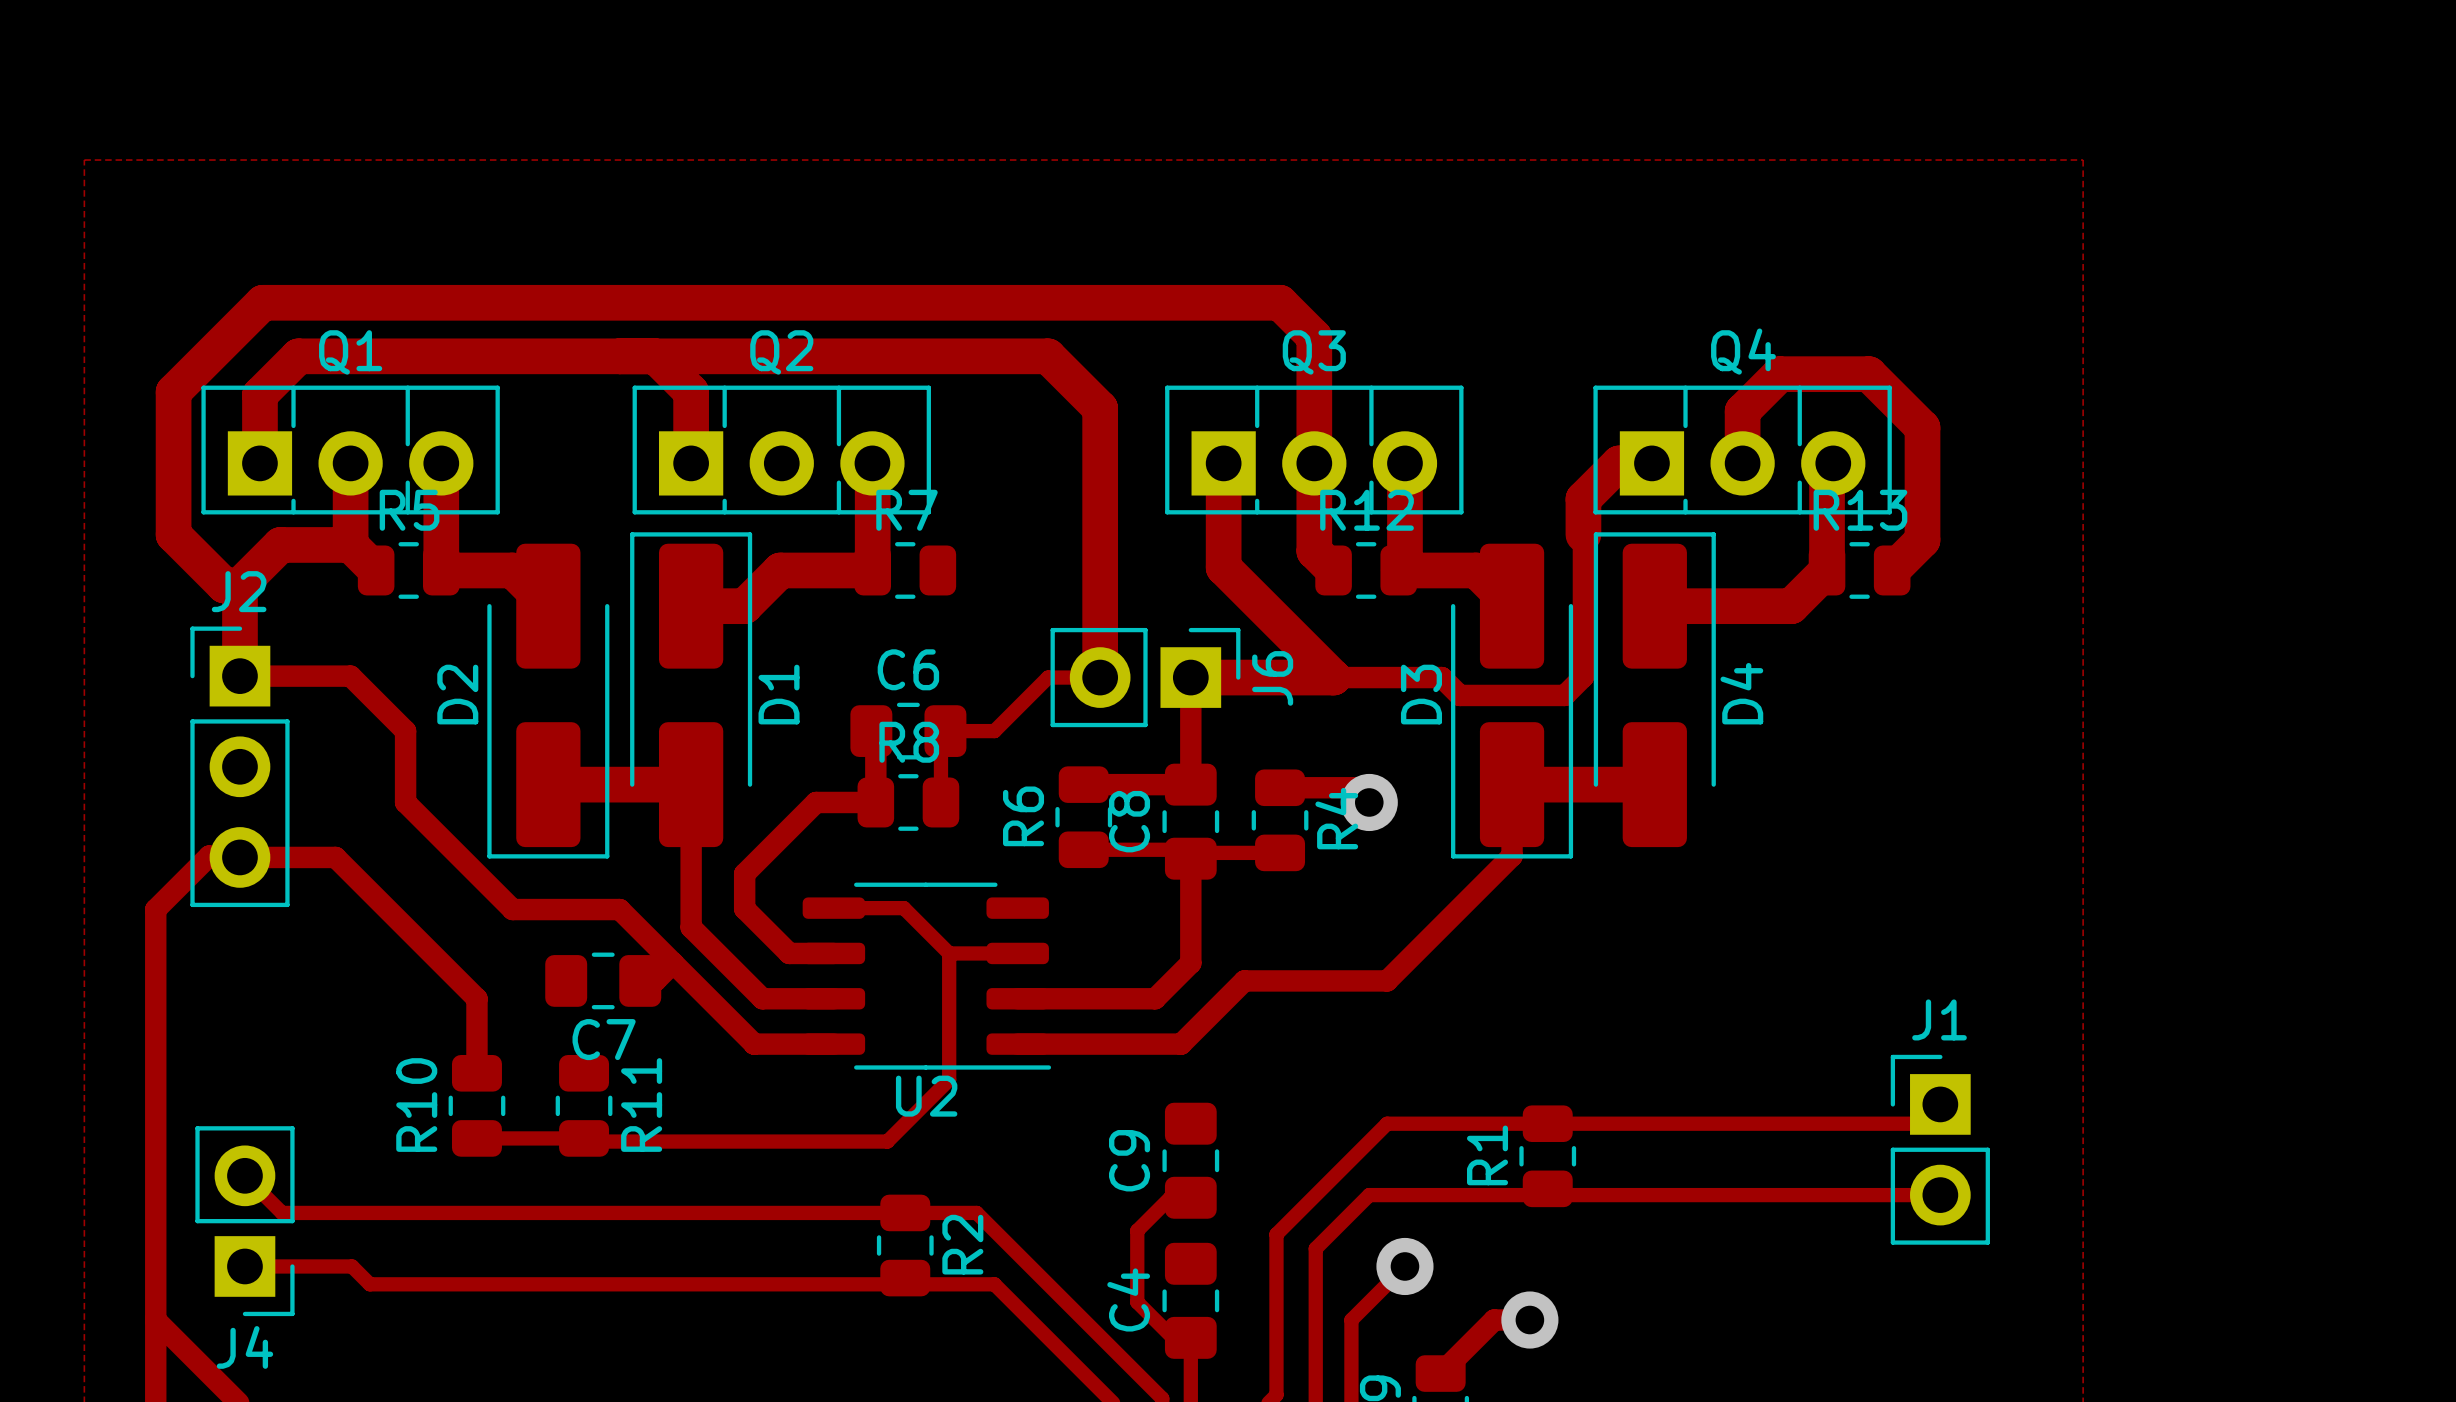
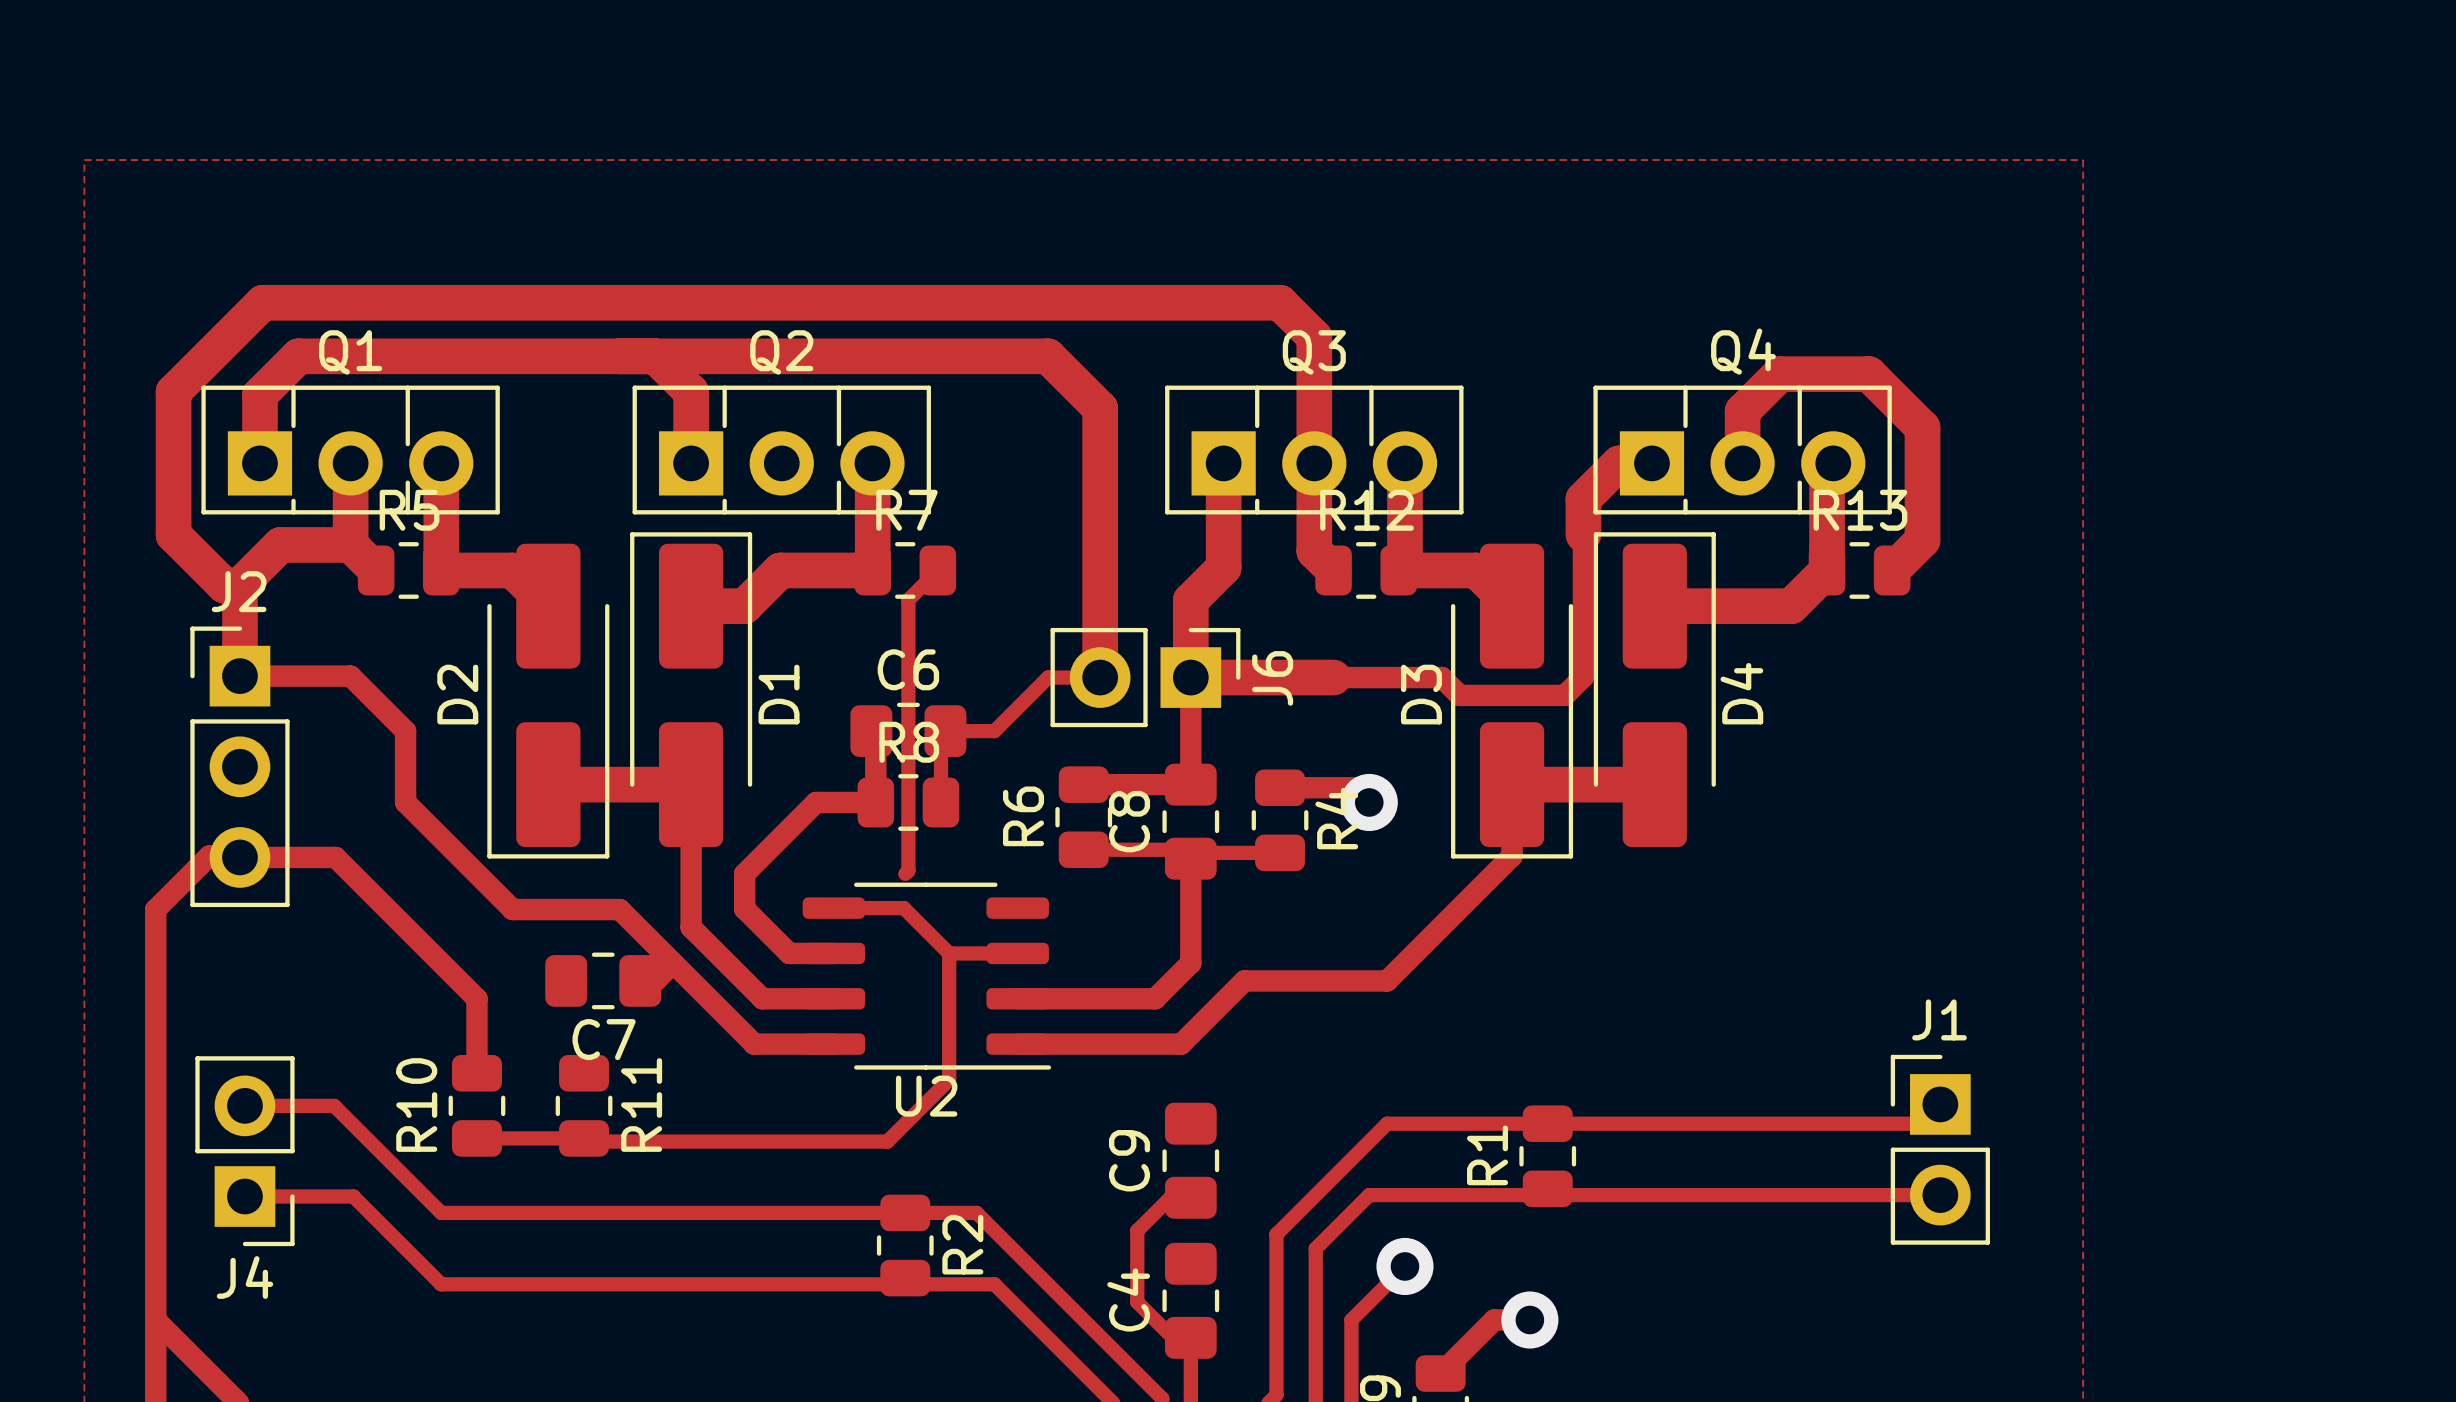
top track: (1223, 567) (1333, 677) -> (1223, 567) (1190, 600) (1190, 677)
top track: none -> (937, 570) (908, 599) (908, 870) (905, 873)
top track: (244, 1175) (282, 1212) (441, 1212) -> (244, 1105) (334, 1105) (441, 1212)
J4 position: (244, 1221) -> (244, 1151)
top track: (244, 1266) (352, 1266) (369, 1284) (441, 1284) -> (244, 1196) (353, 1196) (441, 1284)

